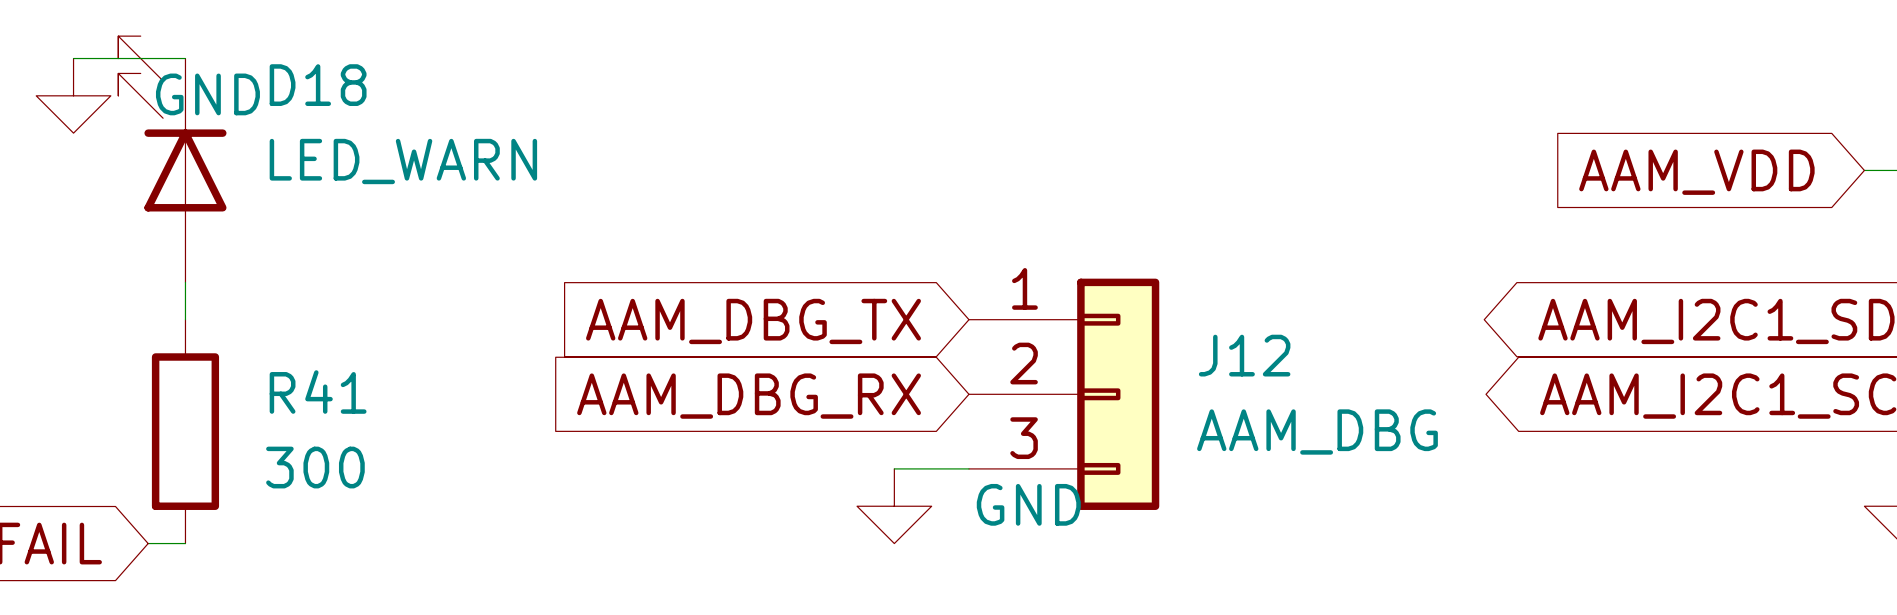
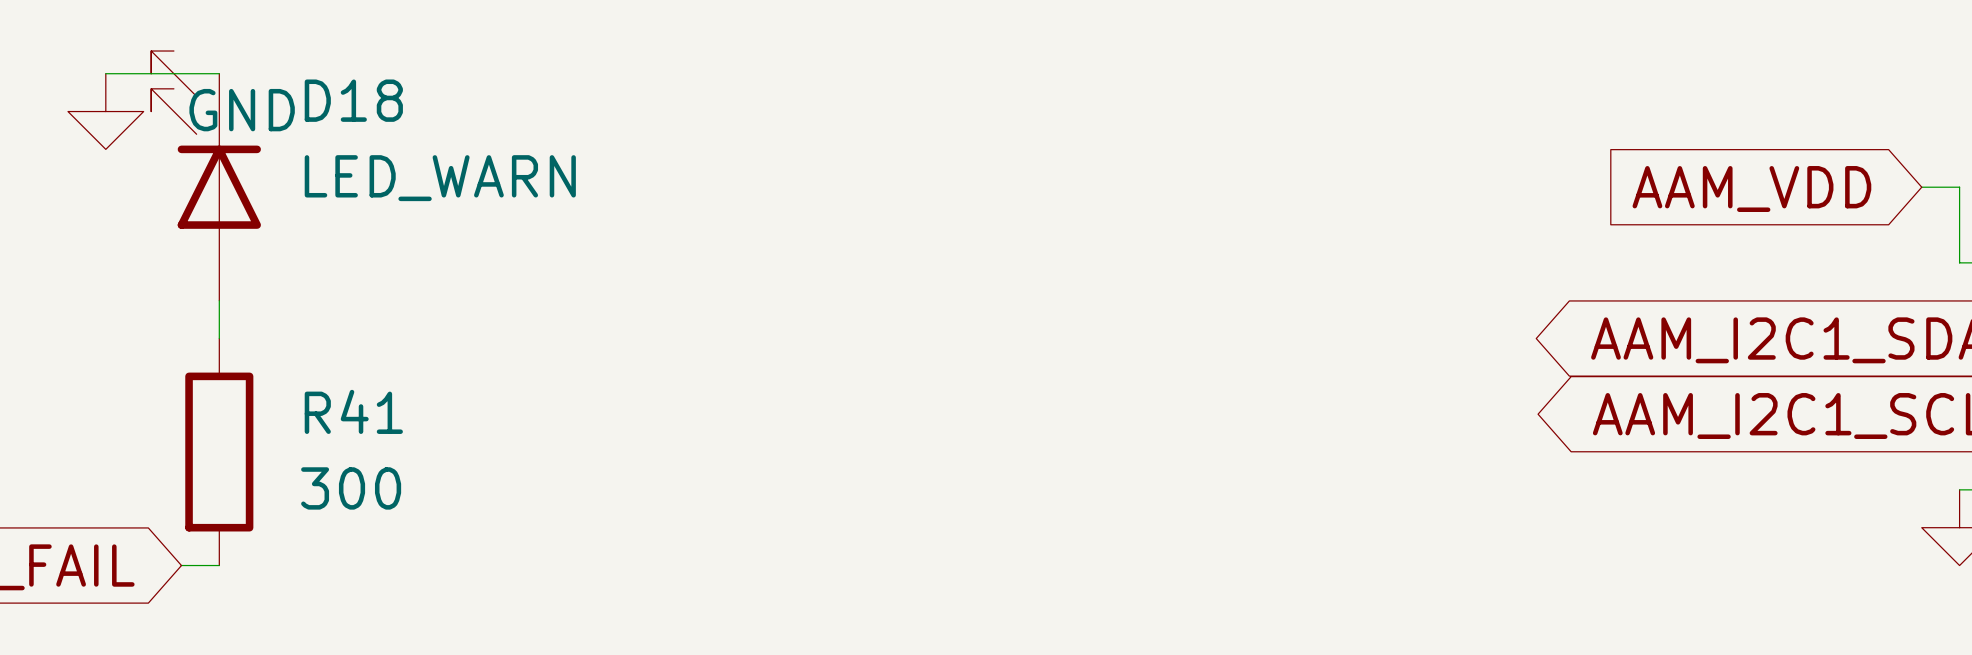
global label: AAM_DBG_TX (753, 321) -> none
J12: AAM_DBG (1064, 394) -> none
global label: AAM_DBG_RX (749, 396) -> none
wire: (894, 468) (968, 468) -> none
power symbol: GND (894, 506) -> none

